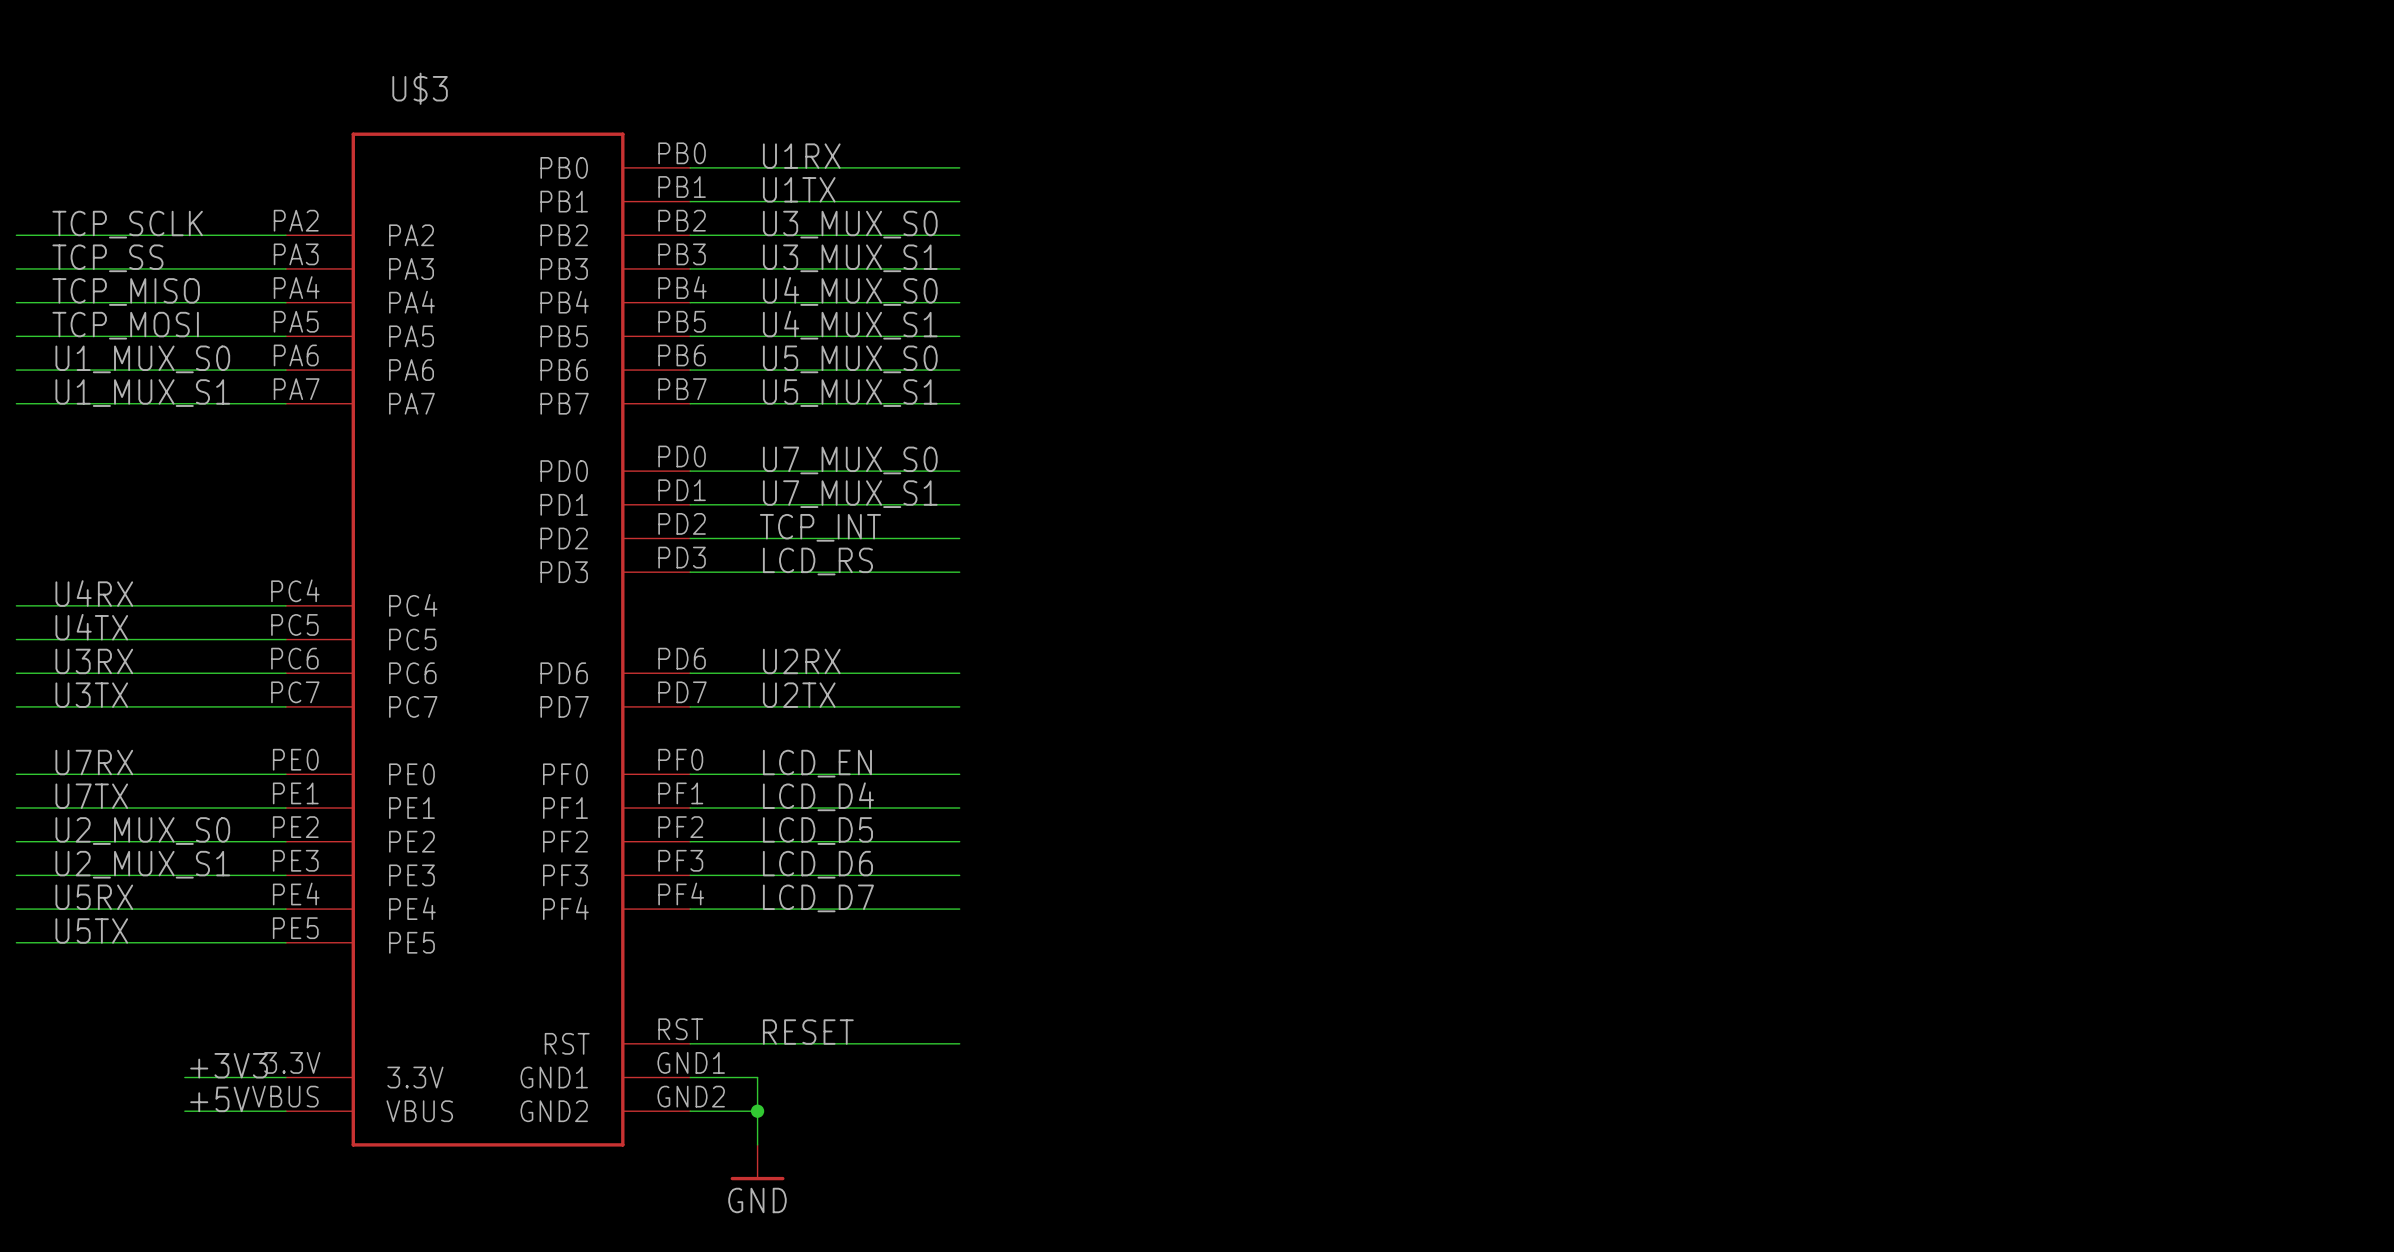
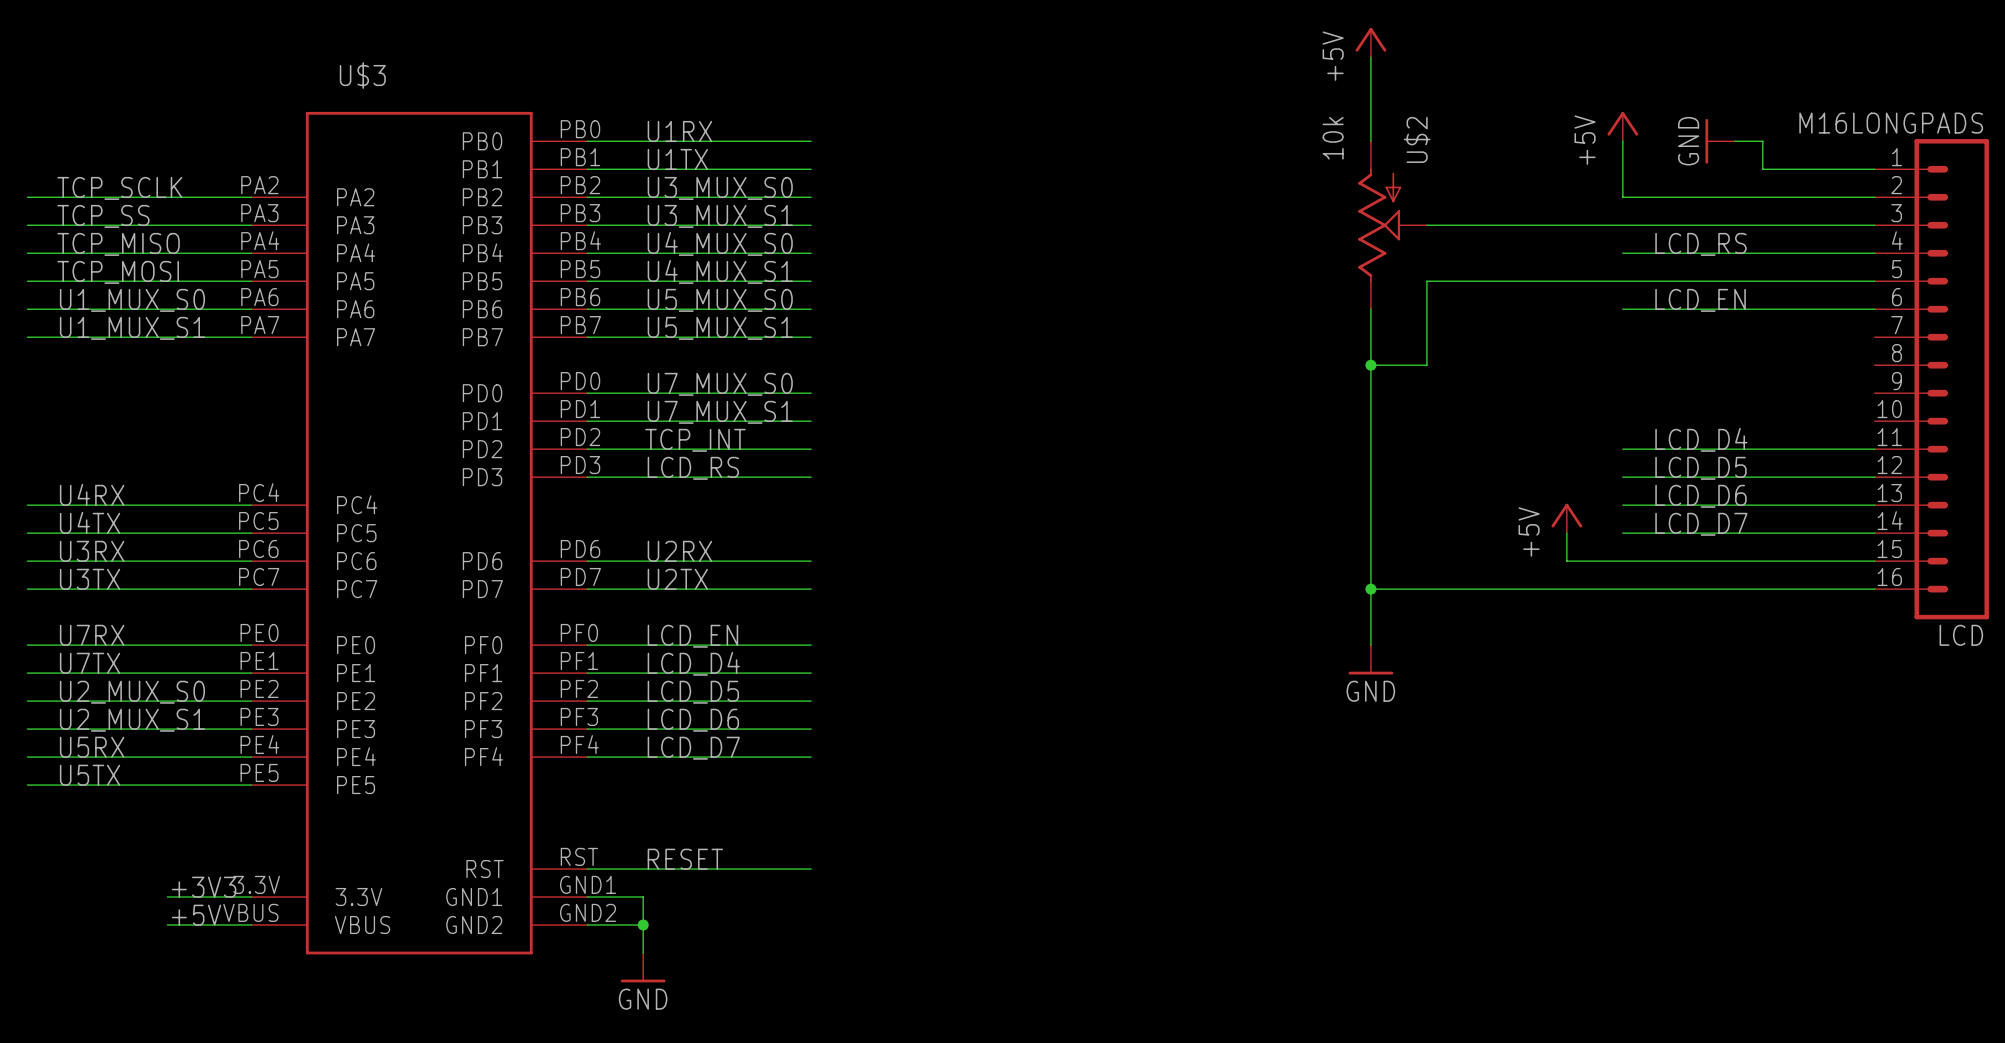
power symbol: none -> +5V (1370, 42)
wire: none -> (1370, 57) (1370, 141)
power symbol: none -> +5V (1622, 126)
wire: none -> (1622, 141) (1622, 197) (1874, 197)
power symbol: none -> GND (1720, 141)
wire: none -> (1734, 141) (1762, 141) (1762, 169) (1874, 169)
U$2: none -> 10k (1392, 225)
wire: none -> (1426, 225) (1874, 225)
label: none -> LCD_RS (1700, 244)
wire: none -> (1622, 253) (1874, 253)
wire: none -> (1874, 281) (1426, 281) (1426, 365) (1370, 365)
label: none -> LCD_EN (1700, 300)
wire: none -> (1370, 309) (1370, 645)
wire: none -> (1622, 309) (1874, 309)
junction: none -> (1370, 365)
LCD: none -> M16LONGPADS (1931, 379)
label: none -> LCD_D4 (1701, 439)
wire: none -> (1622, 449) (1874, 449)
label: none -> LCD_D5 (1700, 468)
wire: none -> (1622, 477) (1874, 477)
label: none -> LCD_D6 (1700, 496)
wire: none -> (1622, 505) (1874, 505)
power symbol: none -> +5V (1566, 518)
label: none -> LCD_D7 (1701, 524)
wire: none -> (1566, 533) (1566, 561) (1874, 561)
wire: none -> (1622, 533) (1874, 533)
wire: none -> (1370, 589) (1874, 589)
junction: none -> (1370, 589)
power symbol: none -> GND (1370, 659)

